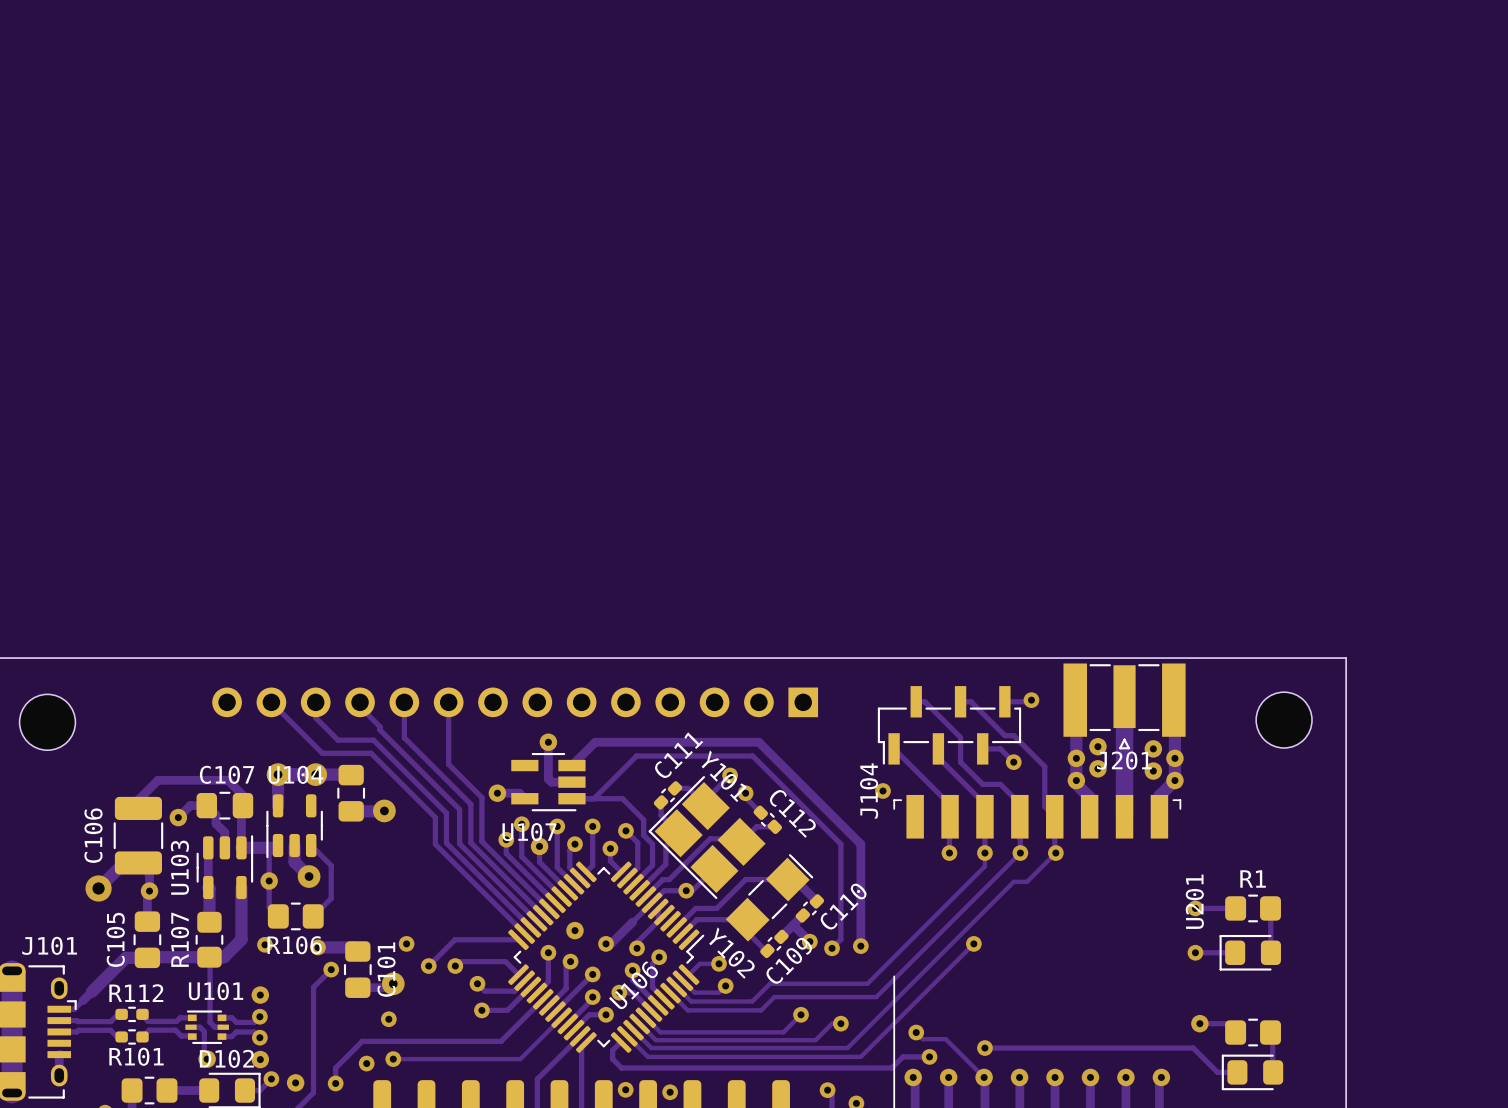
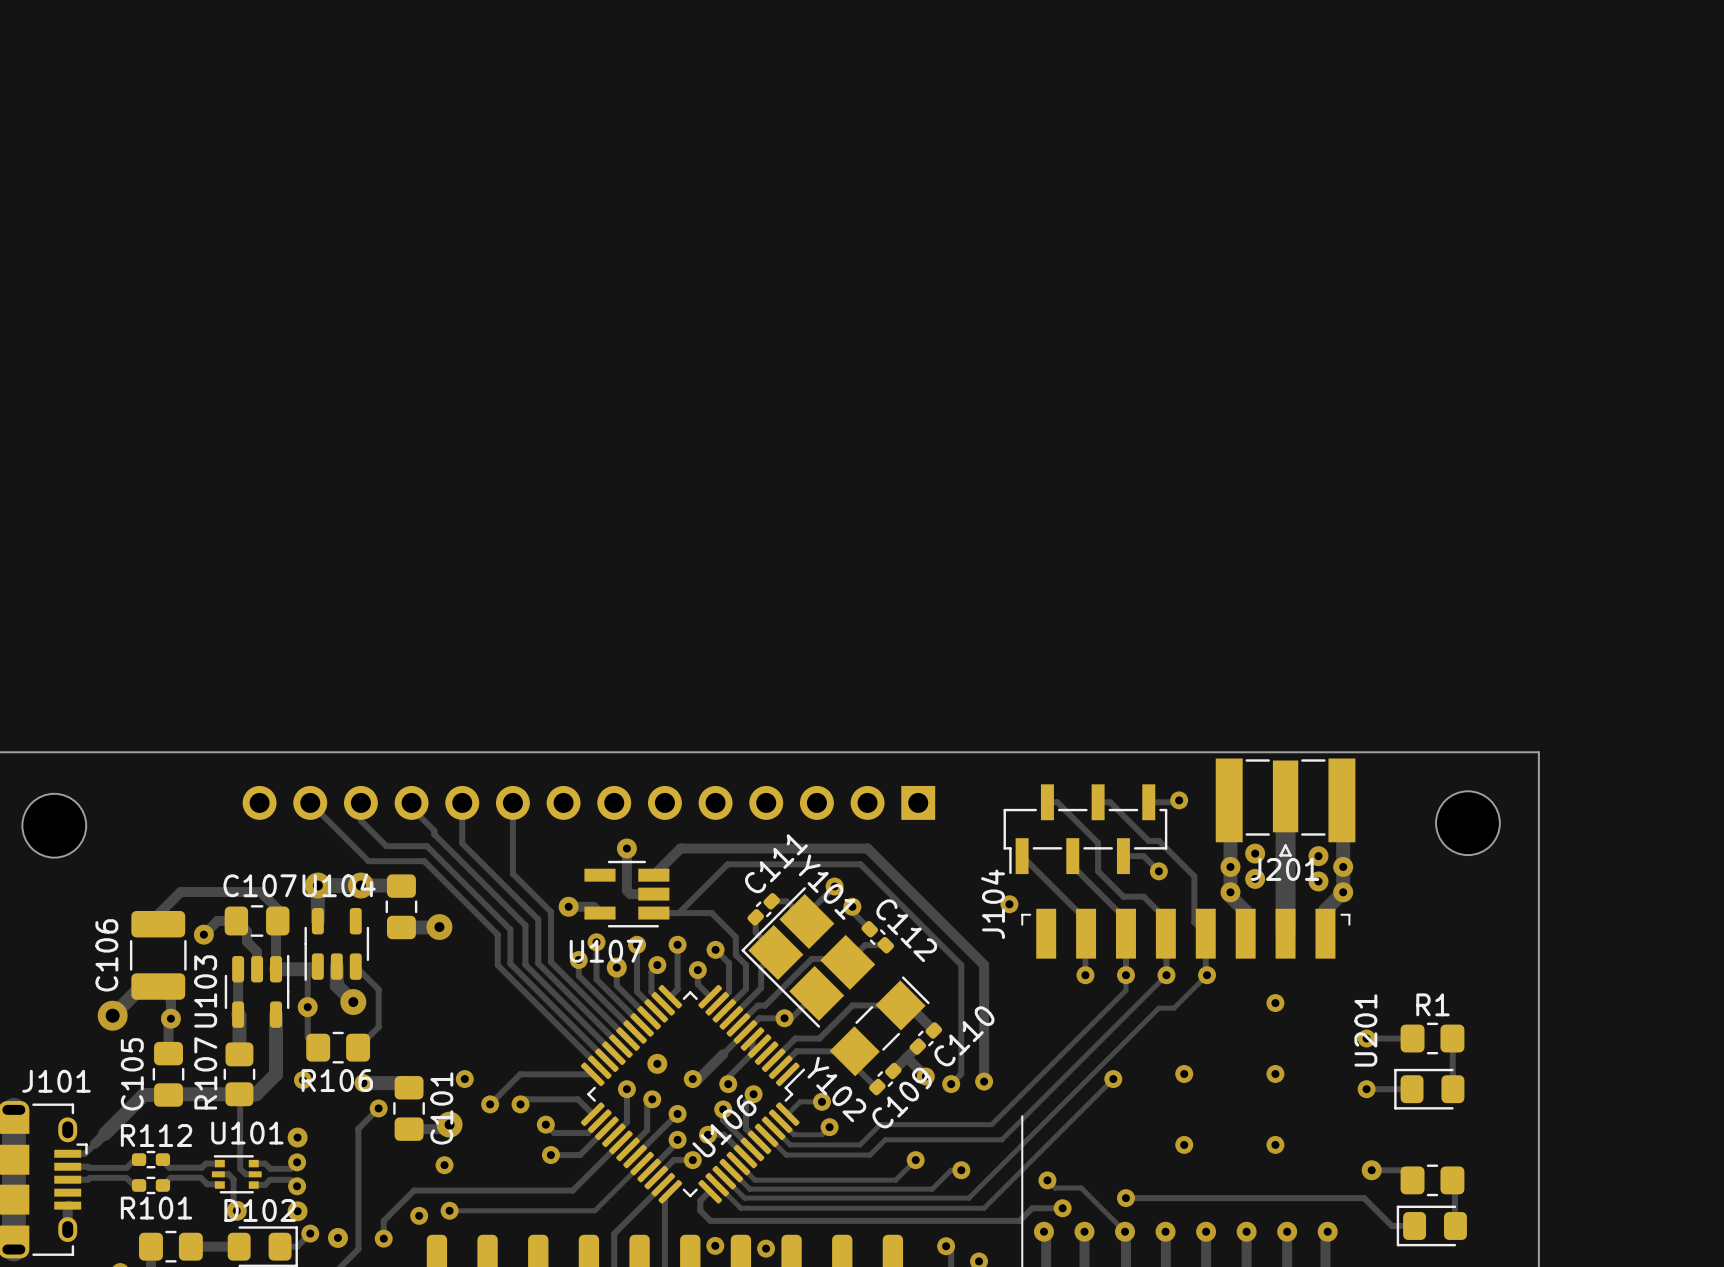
via: none -> (1275, 1003)
via: none -> (1184, 1073)
via: none -> (1275, 1073)
via: none -> (1184, 1144)
via: none -> (1275, 1144)

